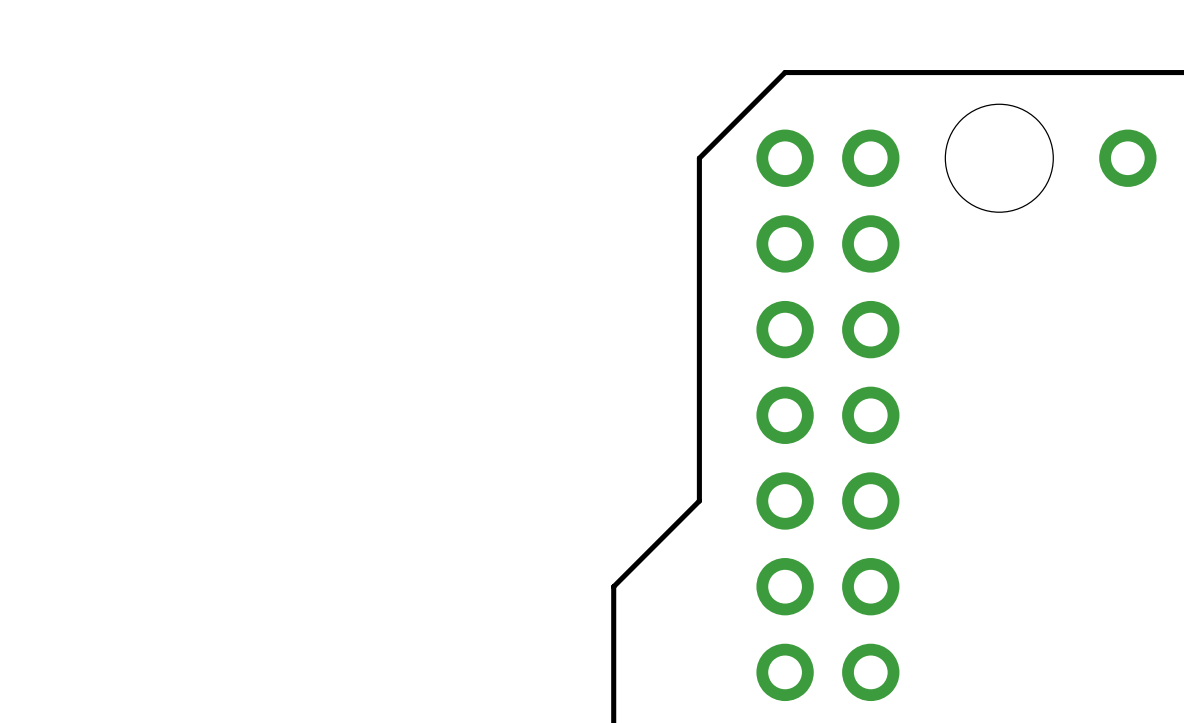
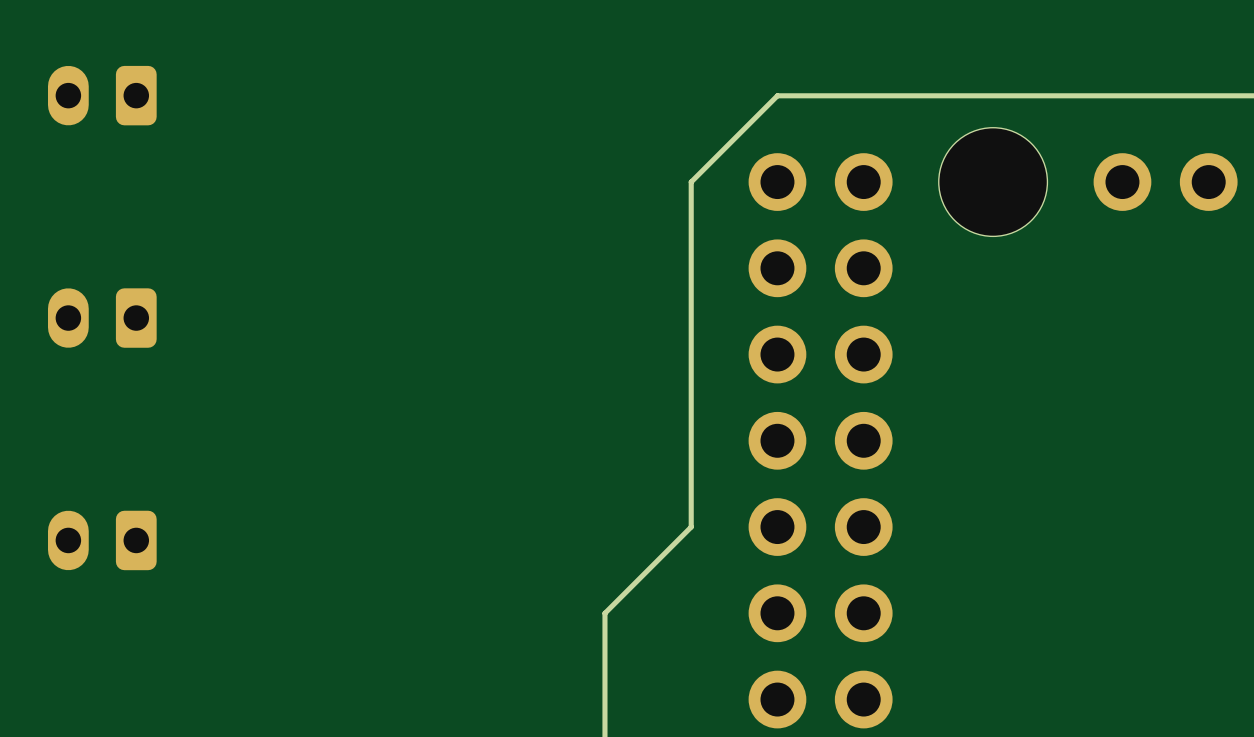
part: none -> (102, 95)
part: none -> (102, 318)
part: none -> (102, 540)

